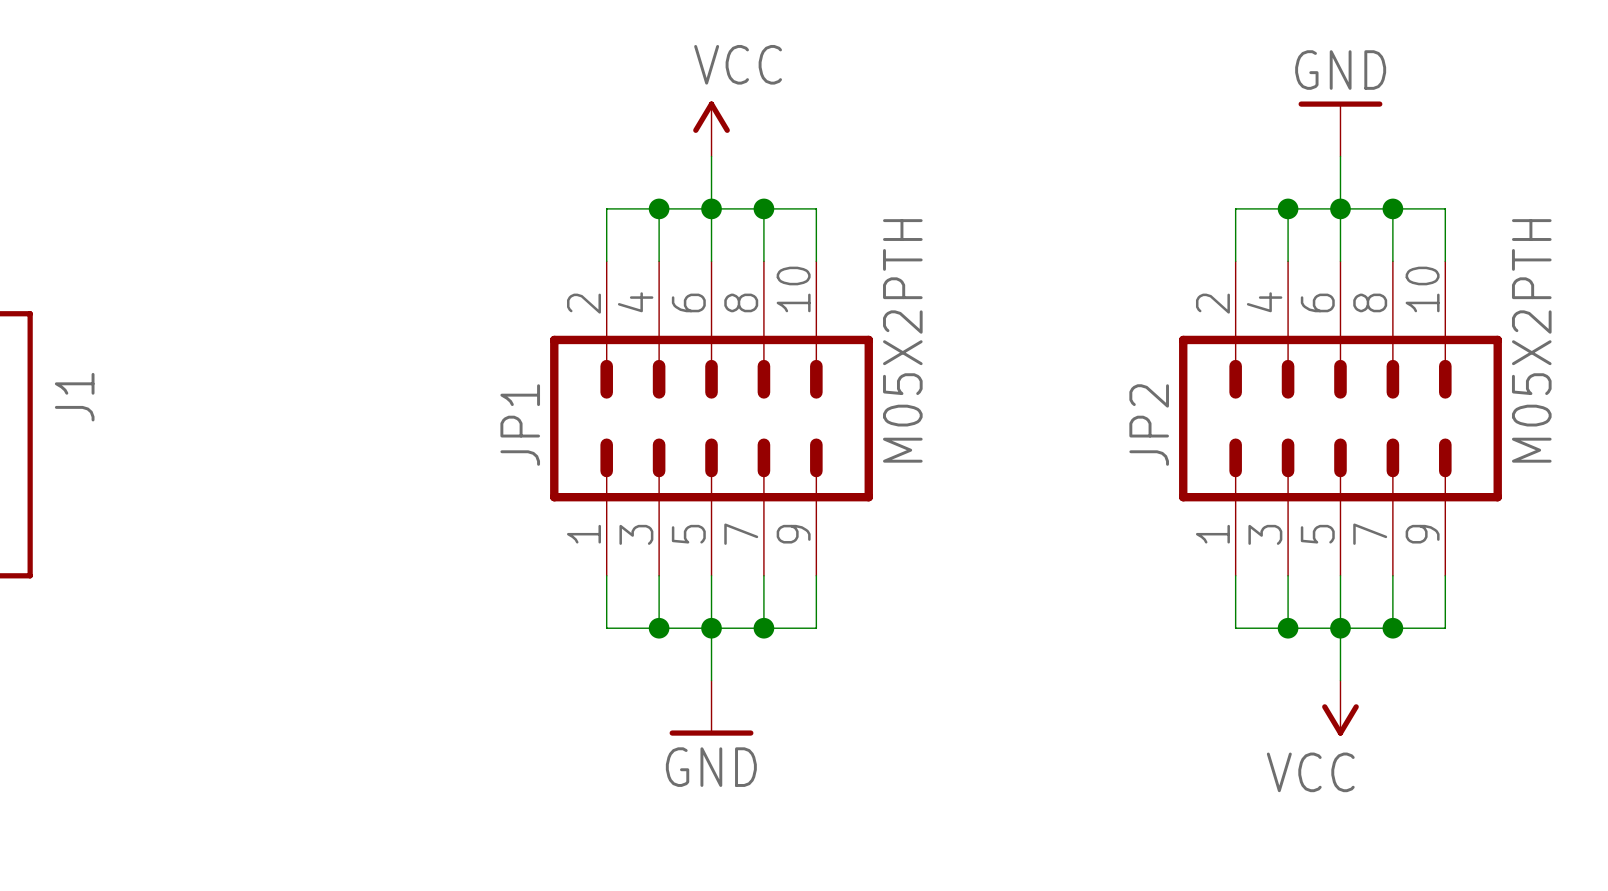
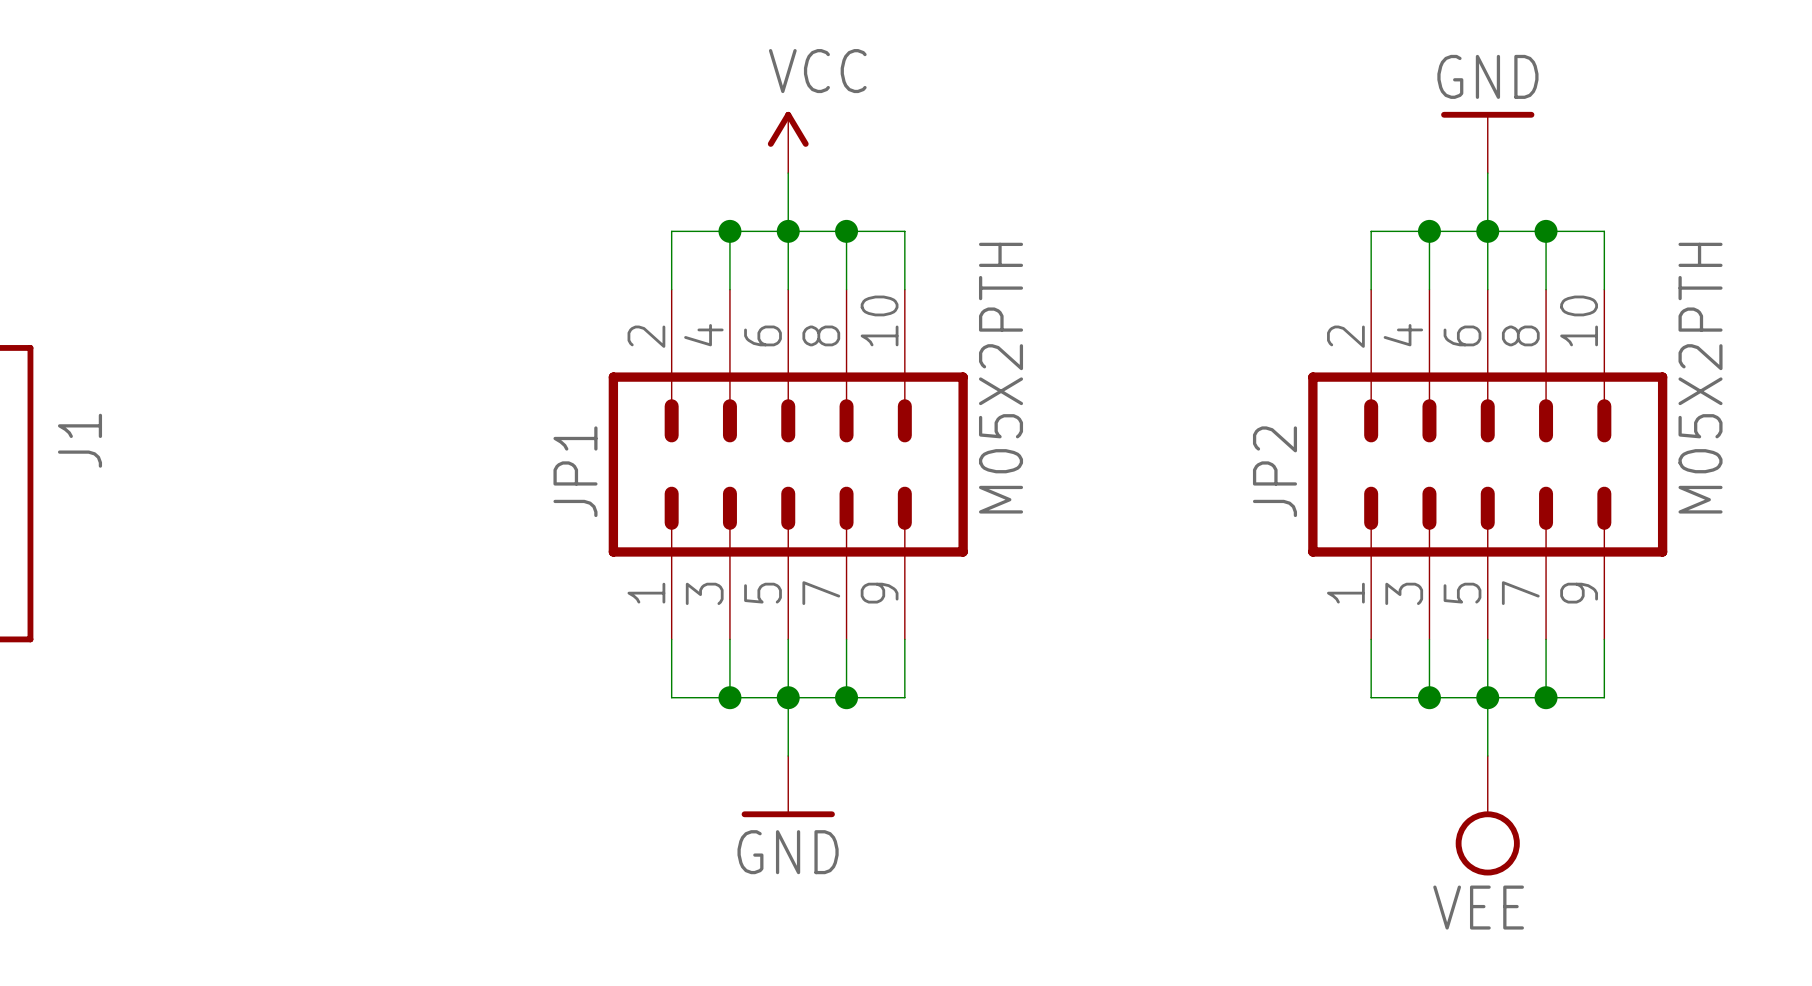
power symbol: VCC (1340, 708) -> none
power symbol: none -> VEE (1487, 815)

